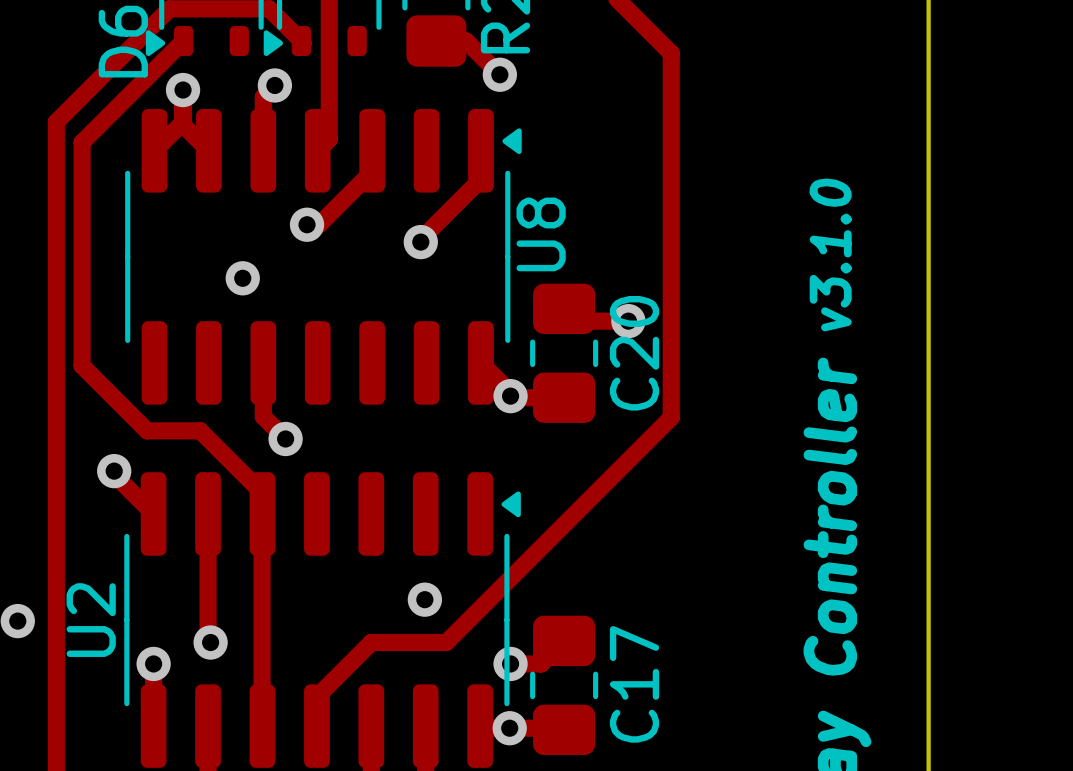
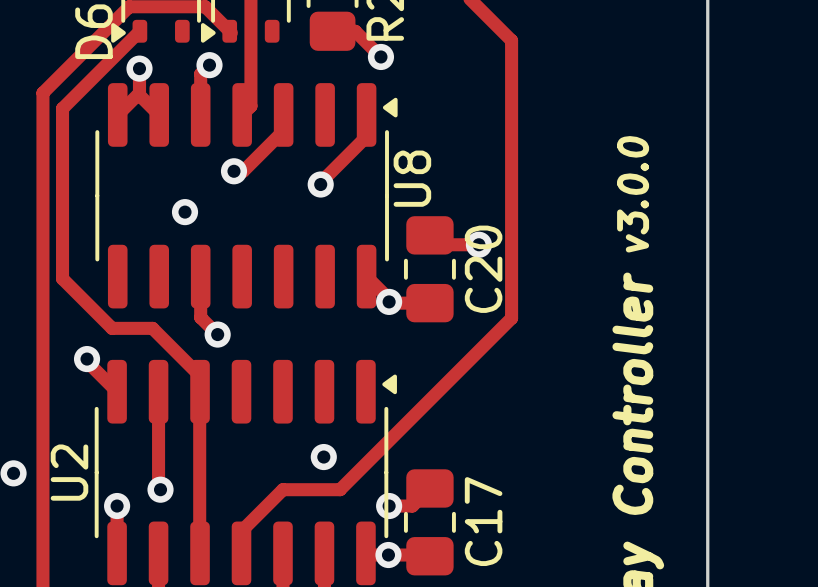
text: v3.1.0 (830, 254) -> v3.0.0 (633, 194)

